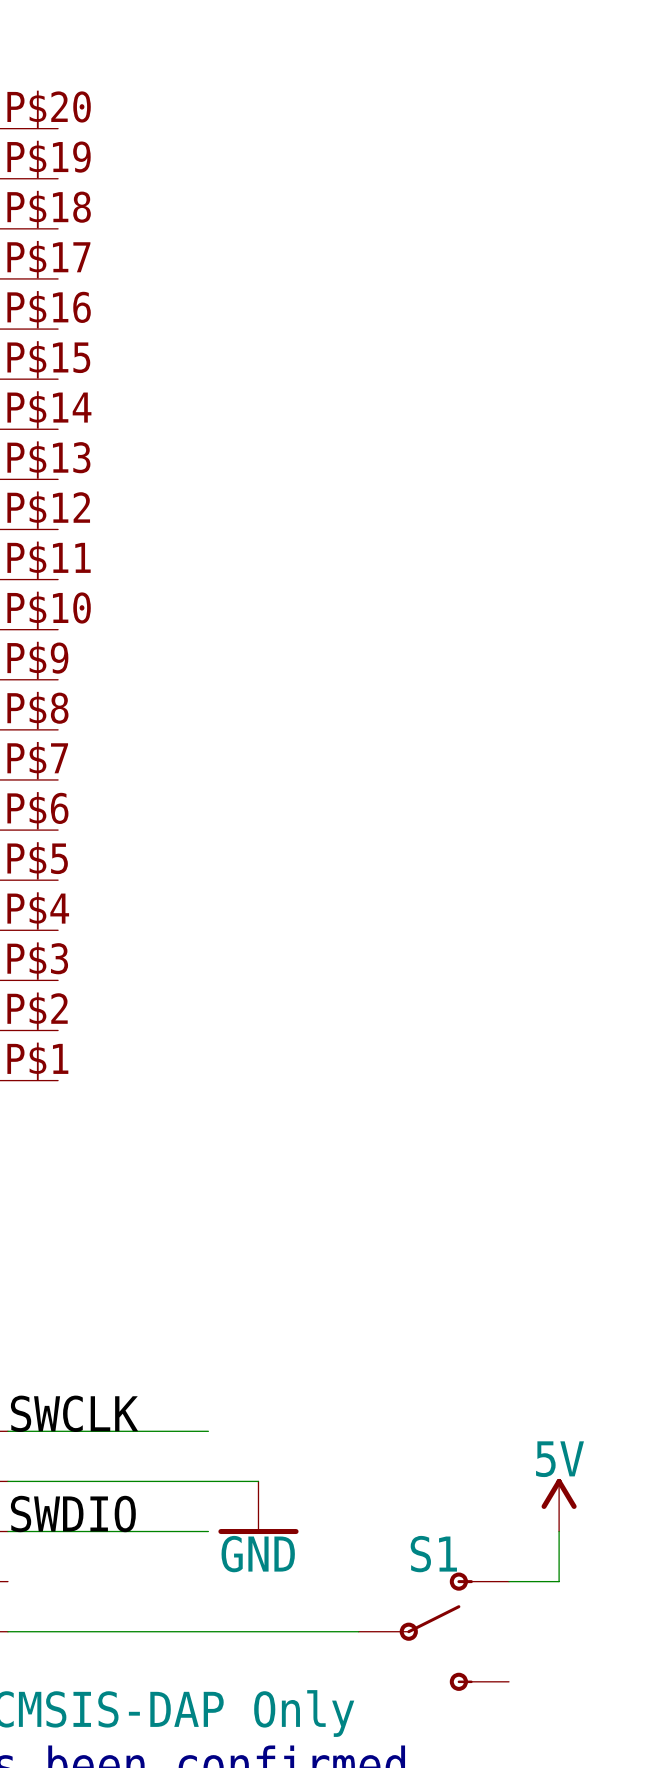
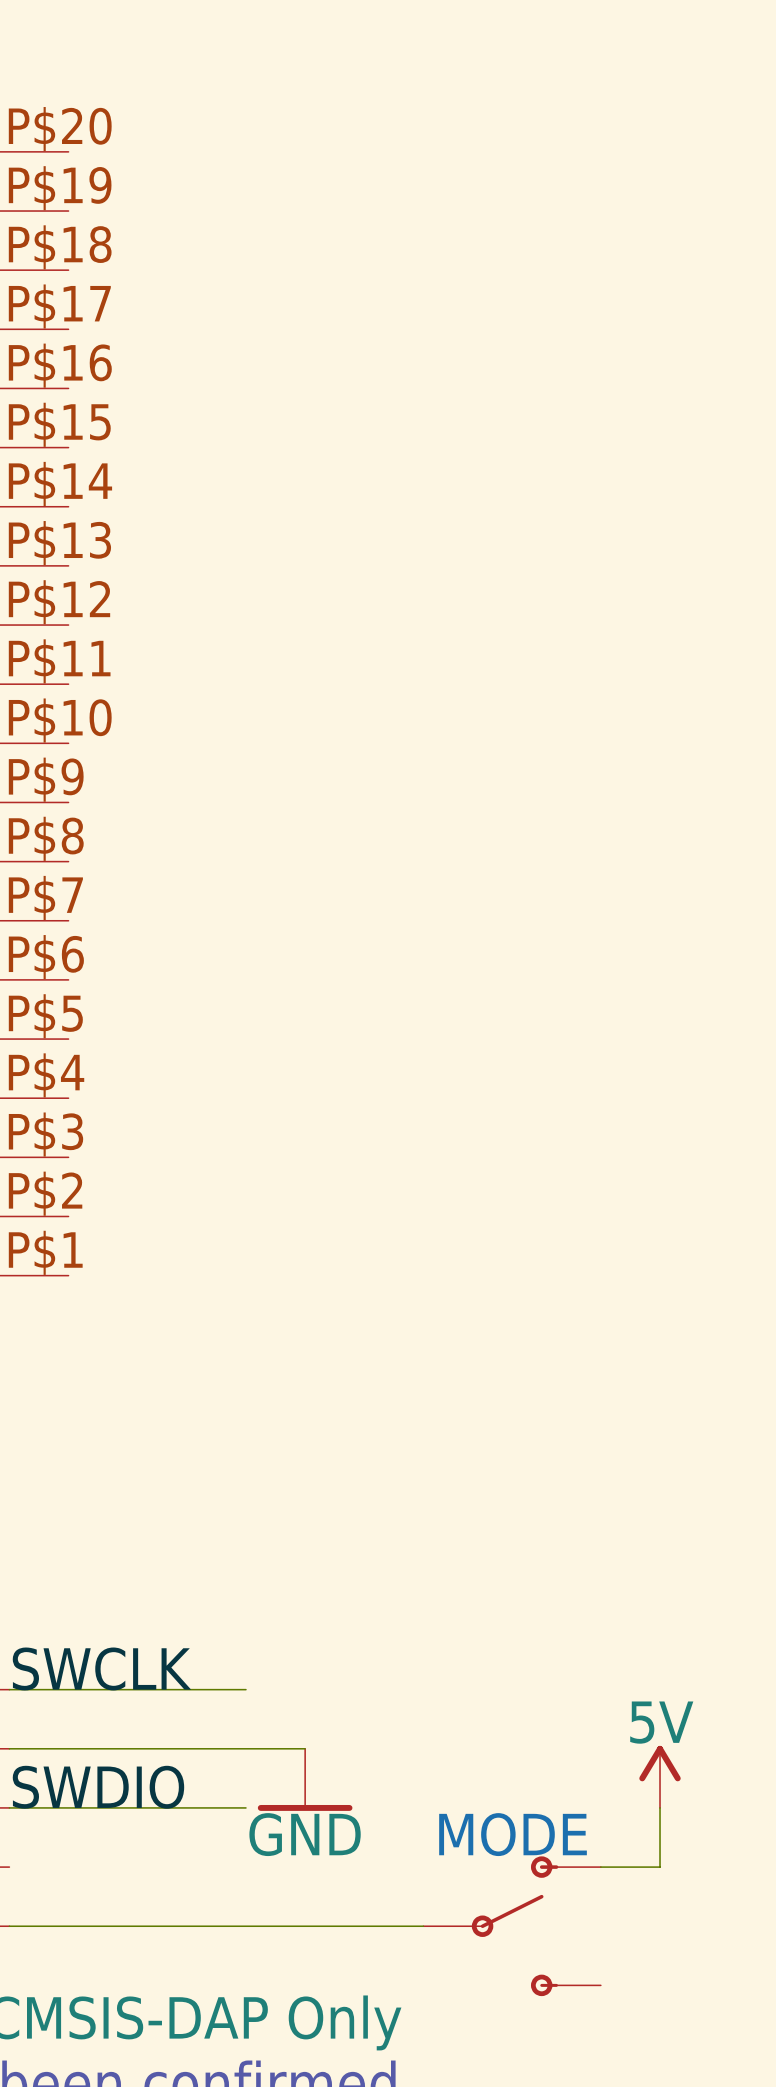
S1 name: S1 (433, 1554) -> MODE (513, 1834)

